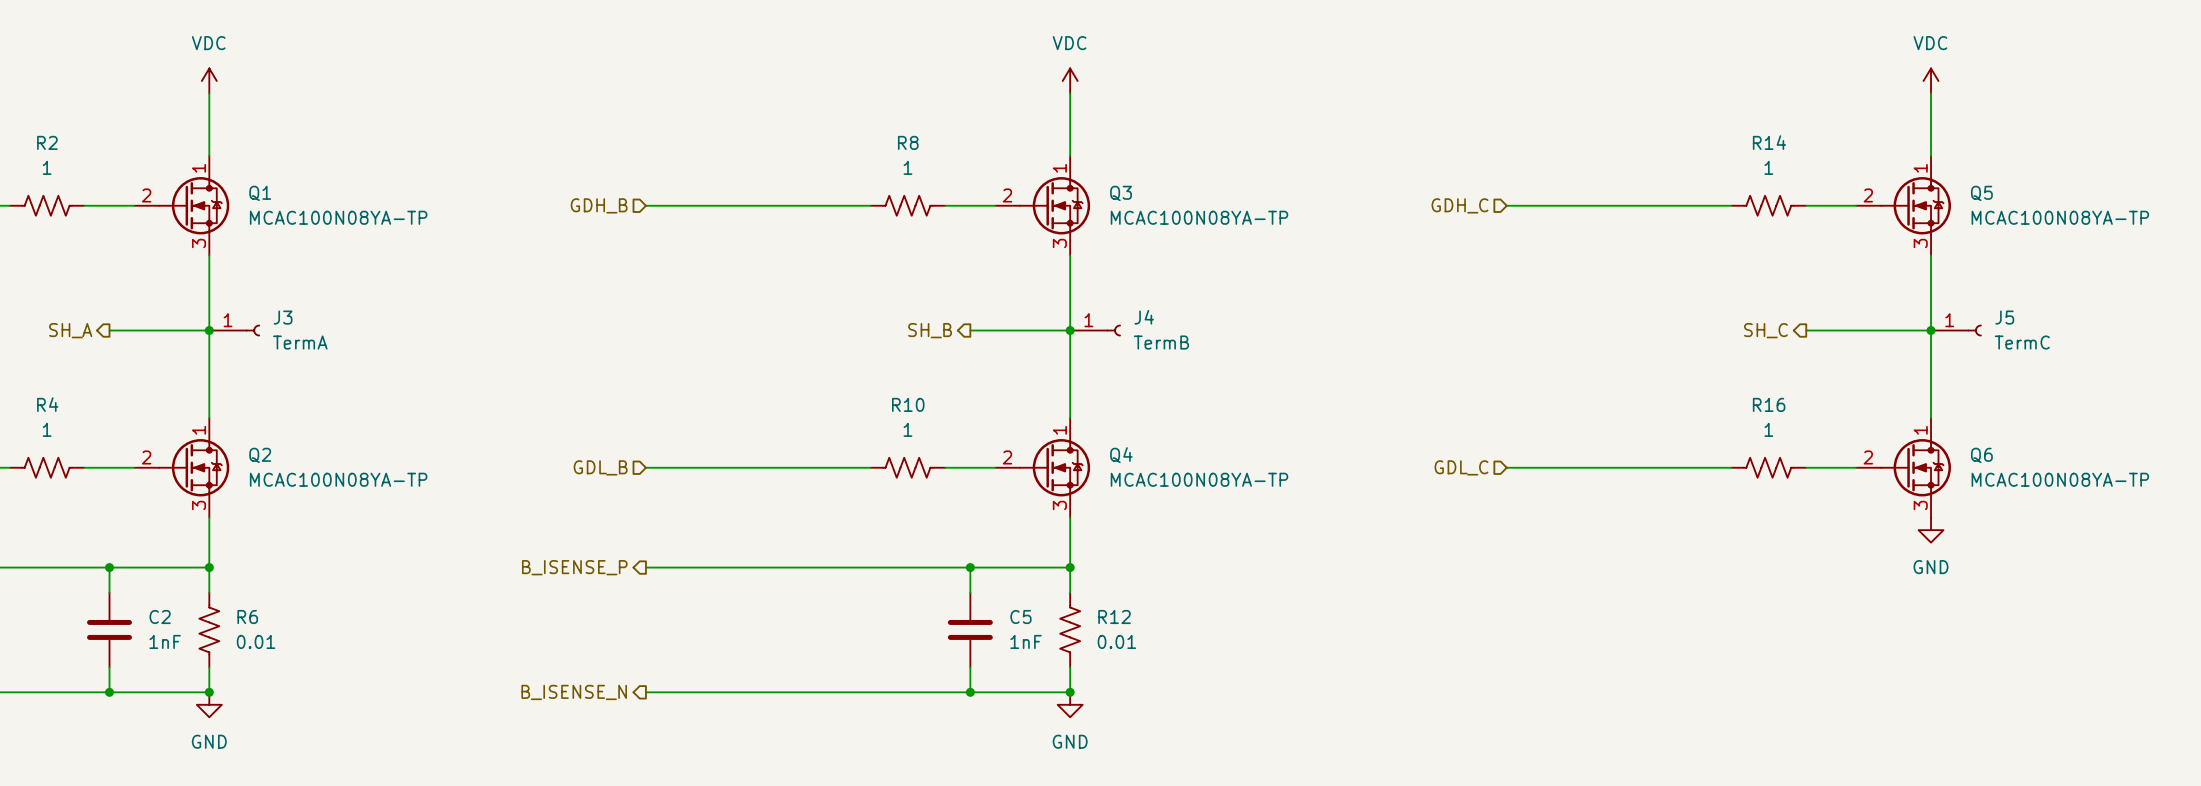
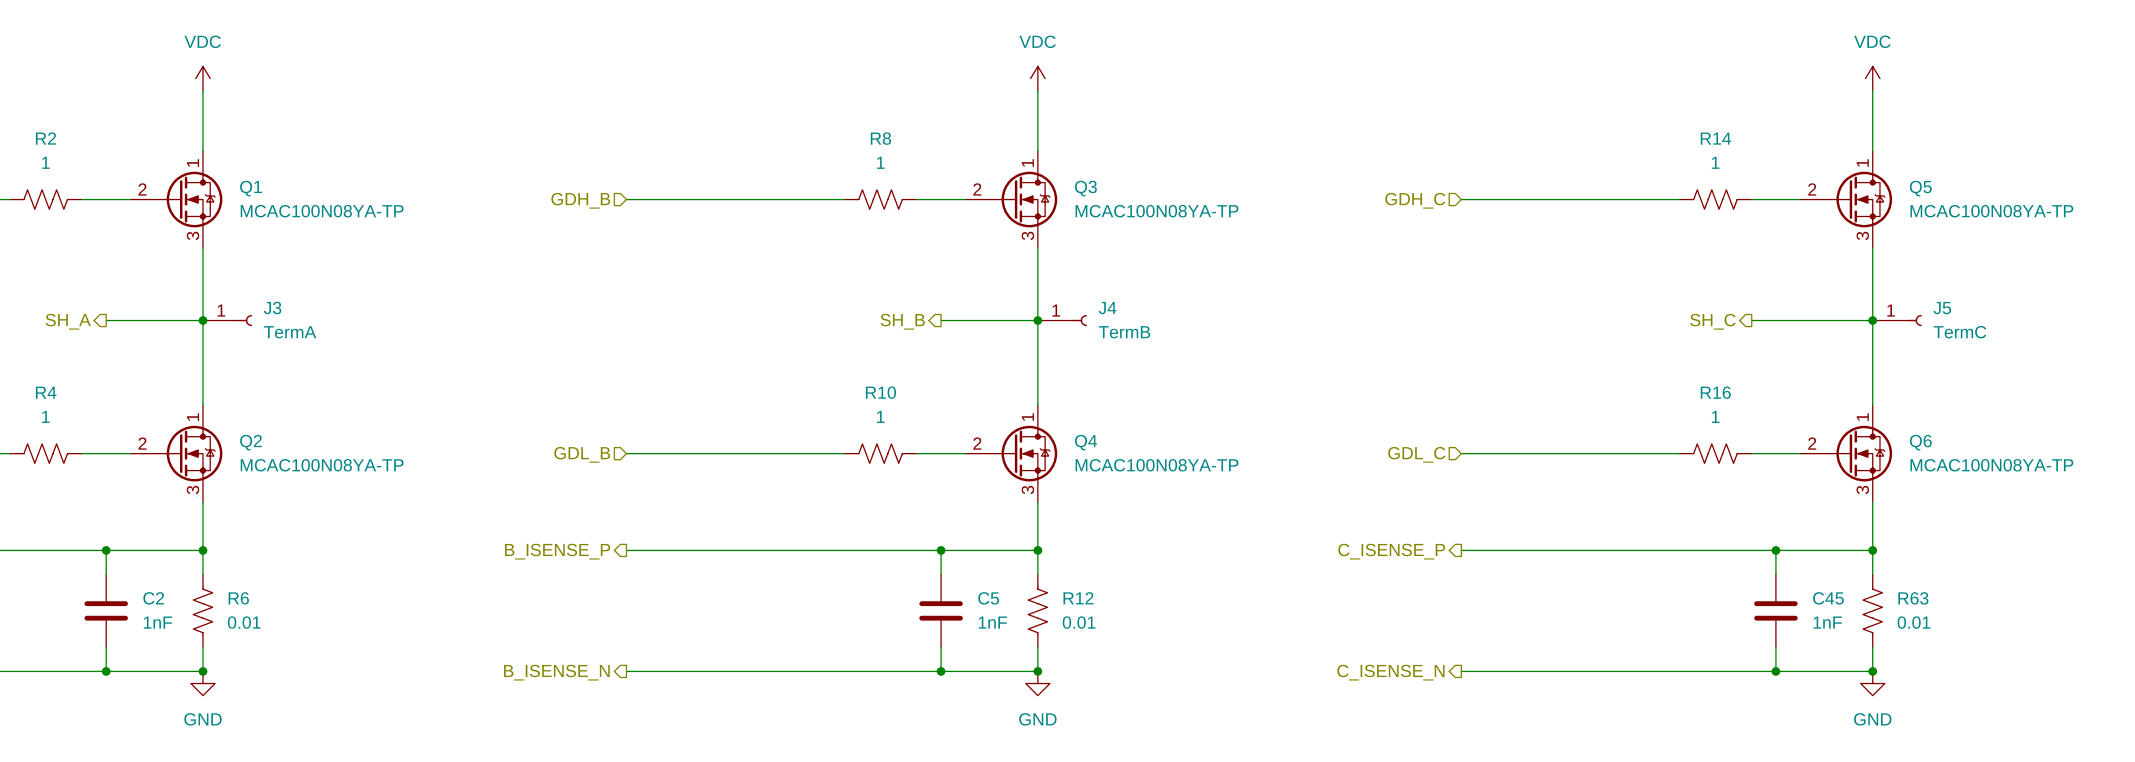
wire: none -> (1872, 502) (1872, 574)
power symbol position: GND (1931, 530) -> GND (1872, 683)
hierarchical label: none -> C_ISENSE_P (1391, 551)
wire: none -> (1461, 550) (1872, 550)
wire: none -> (1775, 550) (1775, 574)
junction: none -> (1775, 550)
junction: none -> (1872, 550)
C45: none -> 1nF (1775, 610)
R63: none -> 0.01 (1872, 610)
wire: none -> (1775, 647) (1775, 671)
wire: none -> (1872, 647) (1872, 671) (1461, 671)
hierarchical label: none -> C_ISENSE_N (1390, 672)
junction: none -> (1775, 671)
junction: none -> (1872, 671)

